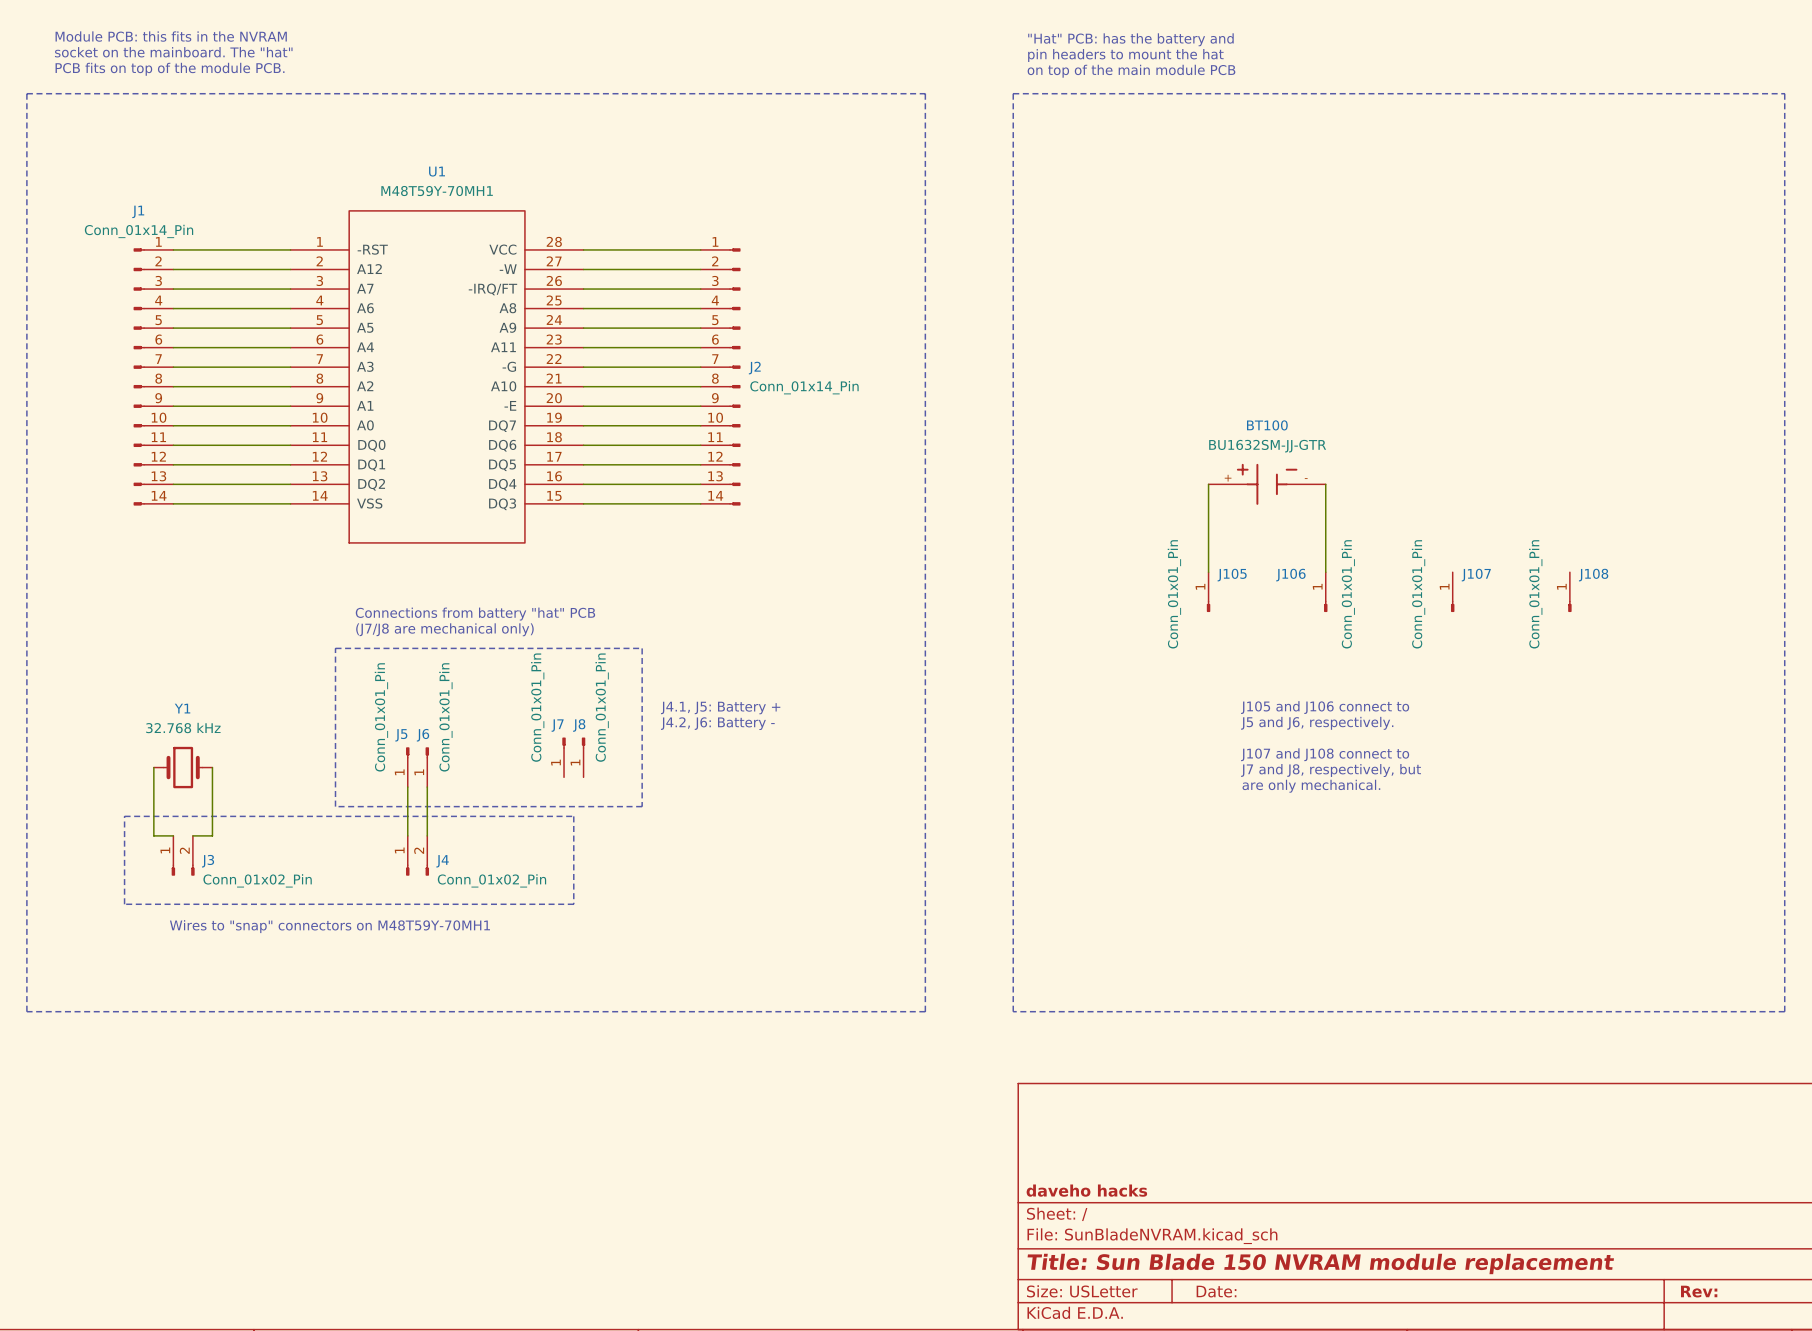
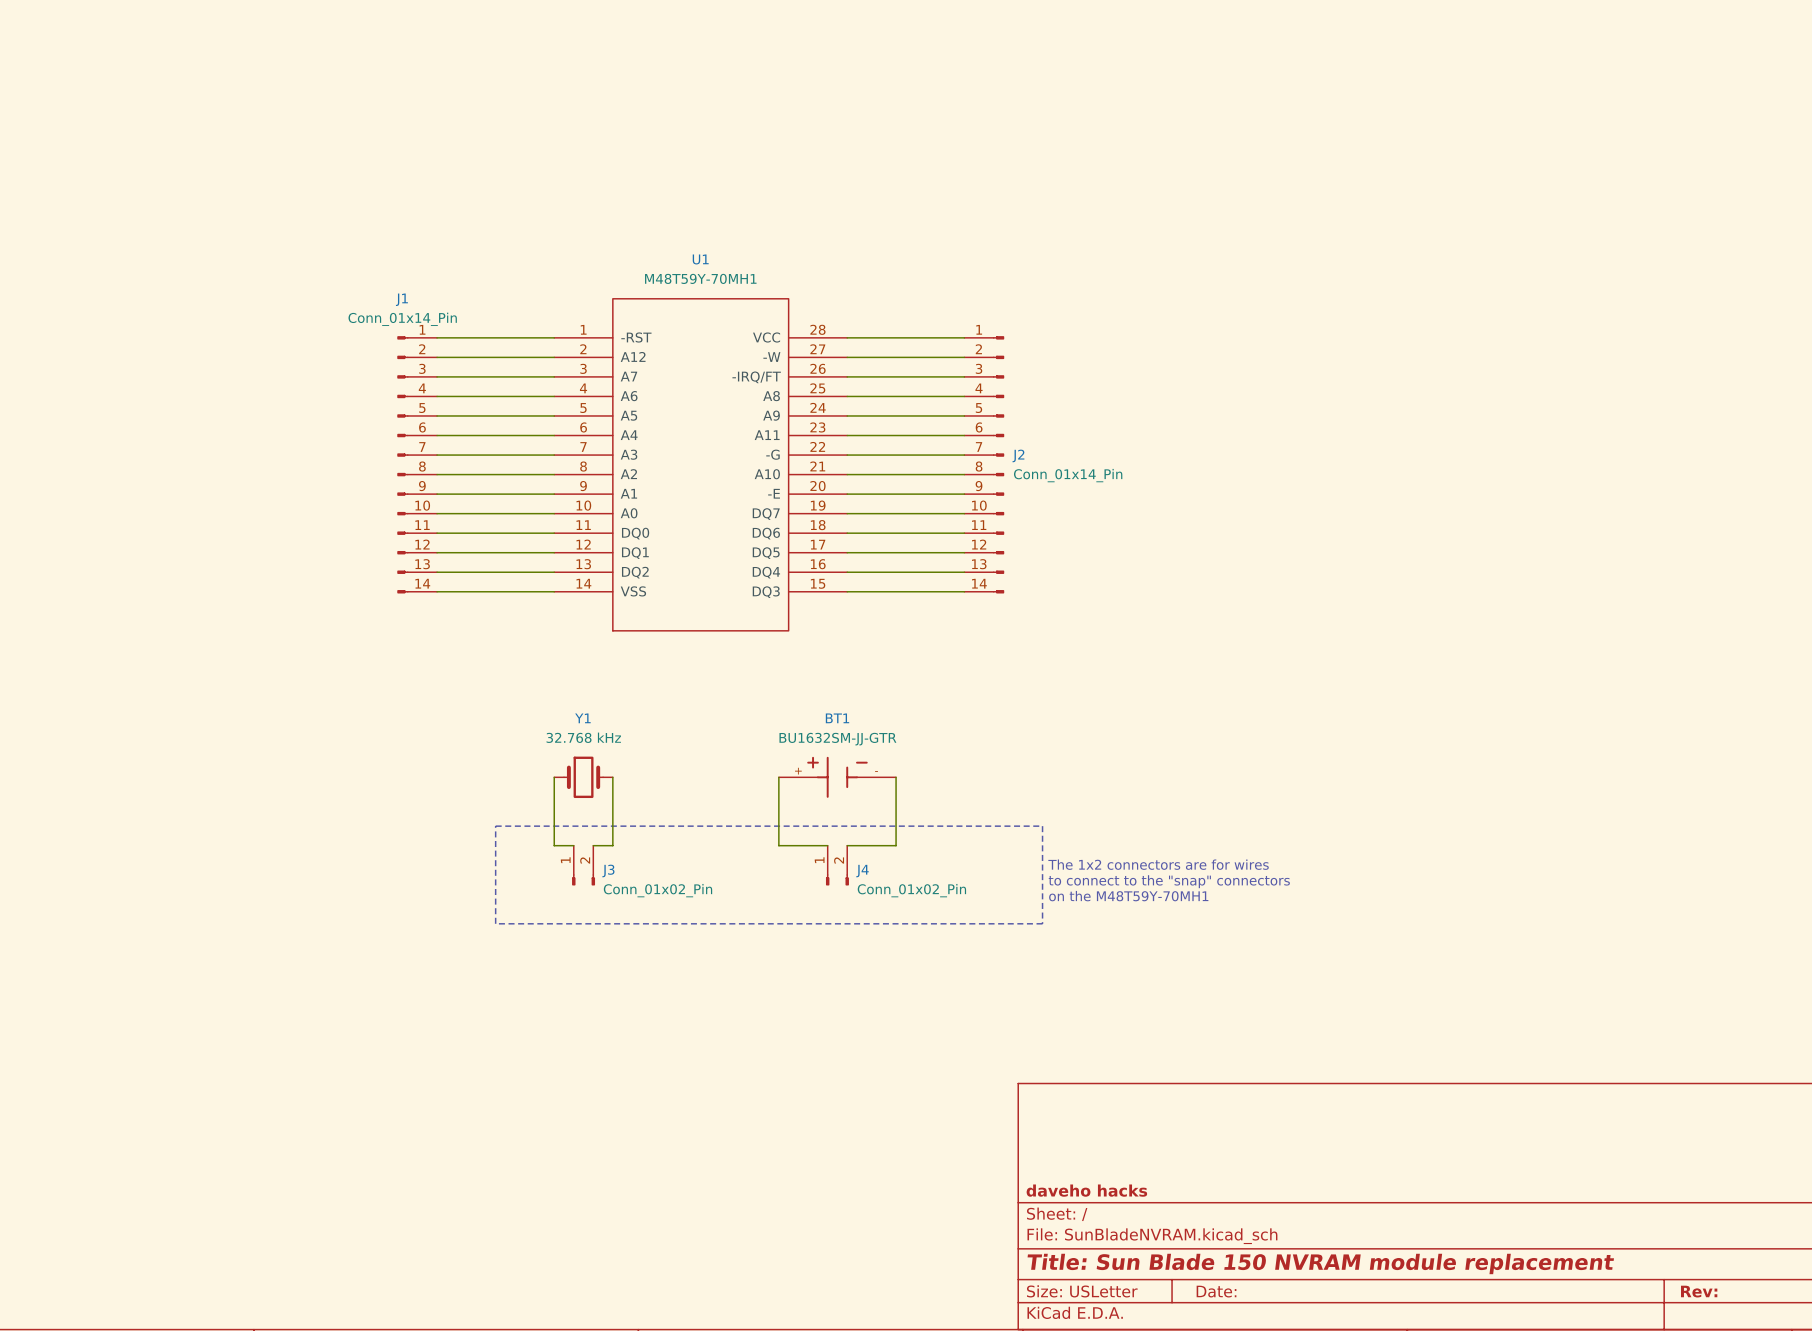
text: Module PCB: this fits in the NVRAM (171, 36) -> none
text: "Hat" PCB: has the battery and (1130, 39) -> none
text: socket on the mainboard. The "hat" (173, 52) -> none
text: pin headers to mount the hat (1125, 55) -> none
text: PCB fits on top of the module PCB. (170, 69) -> none
text: on top of the main module PCB (1131, 71) -> none
line: (26, 93) (925, 93) (925, 1011) (26, 1011) (26, 93) -> none
line: (1013, 93) (1784, 93) (1784, 1011) (1013, 1011) (1013, 93) -> none
wire: (173, 249) (290, 249) -> none
wire: (583, 249) (700, 249) -> (437, 337) (554, 337)
wire: (173, 269) (290, 269) -> none
wire: (583, 269) (700, 269) -> (437, 357) (554, 357)
wire: (173, 289) (290, 289) -> none
wire: (583, 289) (700, 289) -> (437, 376) (554, 376)
wire: (173, 308) (290, 308) -> none
wire: (583, 308) (700, 308) -> (437, 396) (554, 396)
wire: (173, 328) (290, 328) -> none
wire: (583, 328) (700, 328) -> (437, 415) (554, 415)
wire: none -> (847, 337) (964, 337)
wire: (173, 347) (290, 347) -> none
wire: (583, 347) (700, 347) -> (437, 435) (554, 435)
wire: none -> (847, 357) (964, 357)
wire: (173, 367) (290, 367) -> none
wire: (583, 367) (700, 367) -> (437, 455) (554, 455)
J1 position: (153, 376) -> (417, 464)
U1 position: (437, 376) -> (700, 464)
J2 position: (720, 376) -> (984, 464)
wire: none -> (847, 376) (964, 376)
wire: (173, 386) (290, 386) -> none
wire: (583, 386) (700, 386) -> (437, 474) (554, 474)
wire: none -> (847, 396) (964, 396)
wire: (173, 406) (290, 406) -> none
wire: (583, 406) (700, 406) -> (437, 494) (554, 494)
wire: none -> (847, 415) (964, 415)
wire: (173, 425) (290, 425) -> none
wire: (583, 425) (700, 425) -> (437, 513) (554, 513)
wire: none -> (847, 435) (964, 435)
wire: (173, 445) (290, 445) -> none
wire: (583, 445) (700, 445) -> (437, 533) (554, 533)
wire: none -> (847, 455) (964, 455)
wire: (173, 464) (290, 464) -> none
wire: (583, 464) (700, 464) -> (437, 552) (554, 552)
wire: none -> (847, 474) (964, 474)
wire: (173, 484) (290, 484) -> none
wire: (583, 484) (700, 484) -> (437, 572) (554, 572)
wire: (1208, 484) (1208, 572) -> none
BT100: BU1632SM-JJ-GTR (1267, 484) -> none
wire: (1325, 484) (1325, 572) -> none
wire: none -> (847, 494) (964, 494)
wire: (173, 503) (290, 503) -> none
wire: (583, 503) (700, 503) -> (437, 591) (554, 591)
wire: none -> (847, 513) (964, 513)
wire: none -> (847, 533) (964, 533)
wire: none -> (847, 552) (964, 552)
wire: none -> (847, 572) (964, 572)
wire: none -> (847, 591) (964, 591)
J105: Conn_01x01_Pin (1208, 592) -> none
J106: Conn_01x01_Pin (1325, 592) -> none
J107: Conn_01x01_Pin (1452, 592) -> none
J108: Conn_01x01_Pin (1569, 592) -> none
text: Connections from battery "hat" PCB (475, 614) -> none
text: (J7/J8 are mechanical only) (444, 629) -> none
line: (335, 648) (642, 648) (642, 806) (335, 806) (335, 648) -> none
text: J105 and J106 connect to (1325, 707) -> none
text: J4.1, J5: Battery + (720, 708) -> none
text: J4.2, J6: Battery - (717, 723) -> none
text: J5 and J6, respectively. (1317, 723) -> none
text: J107 and J108 connect to (1325, 754) -> none
J7: Conn_01x01_Pin (564, 757) -> none
J8: Conn_01x01_Pin (583, 757) -> none
wire: (153, 767) (153, 835) (173, 835) -> none
Y1 position: (183, 767) -> (583, 777)
wire: (212, 767) (212, 835) (192, 835) -> none
J5: Conn_01x01_Pin (407, 767) -> none
J6: Conn_01x01_Pin (427, 767) -> none
text: J7 and J8, respectively, but (1331, 770) -> none
wire: none -> (554, 777) (554, 845) (573, 845)
wire: none -> (612, 777) (612, 845) (593, 845)
wire: none -> (778, 777) (778, 845) (827, 845)
BT1: none -> BU1632SM-JJ-GTR (837, 777)
wire: none -> (896, 777) (896, 845) (847, 845)
text: are only mechanical. (1311, 786) -> none
wire: (407, 787) (407, 835) -> none
wire: (427, 787) (427, 835) -> none
line: (124, 816) (573, 816) (573, 904) (124, 904) (124, 816) -> none
line: none -> (495, 826) (1042, 826) (1042, 923) (495, 923) (495, 826)
J3 position: (183, 855) -> (583, 865)
J4 position: (417, 855) -> (837, 865)
text: none -> The 1x2 connectors are for wires (1158, 864)
text: none -> to connect to the "snap" connectors (1169, 881)
text: none -> on the M48T59Y-70MH1 (1128, 896)
text: Wires to "snap" connectors on M48T59Y-70MH1 (329, 926) -> none

